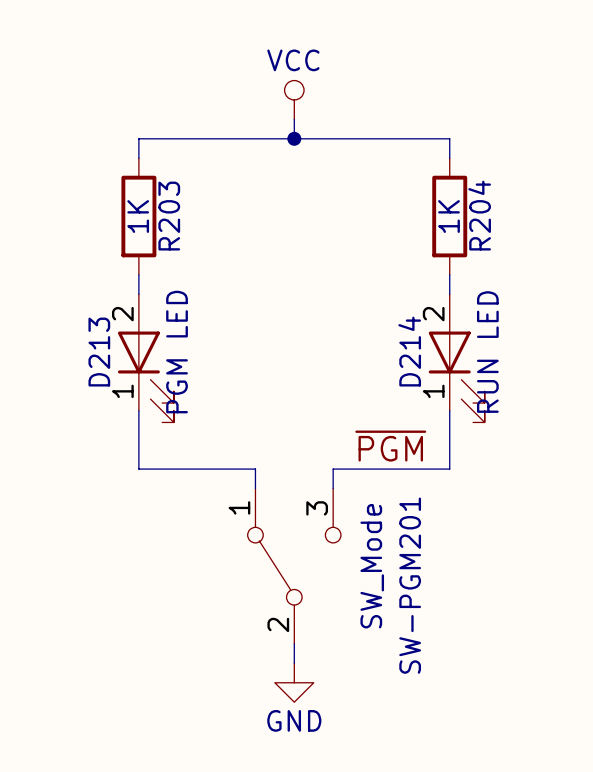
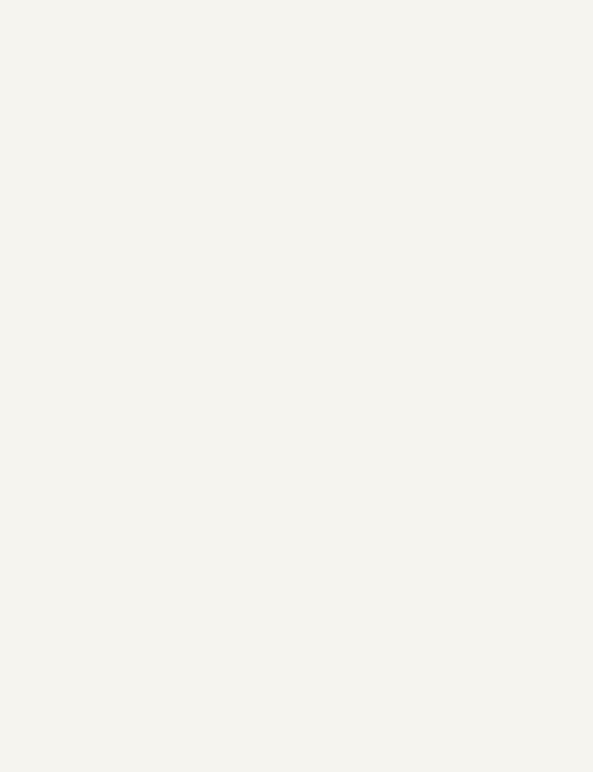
power symbol: VCC (294, 99) -> none
wire: (294, 119) (294, 138) -> none
junction: (294, 138) -> none
wire: (138, 158) (138, 138) (449, 138) (449, 158) -> none
R203: 1K (138, 216) -> none
R204: 1K (449, 216) -> none
wire: (138, 274) (138, 294) -> none
wire: (449, 274) (449, 294) -> none
D213: PGM LED (145, 358) -> none
D214: RUN LED (456, 358) -> none
wire: (138, 410) (138, 469) (255, 469) (255, 488) -> none
wire: (449, 410) (449, 469) (333, 469) (333, 488) -> none
label: ~{PGM} (390, 446) -> none
SW-PGM201: SW_Mode (294, 566) -> none
wire: (294, 643) (294, 663) -> none
power symbol: GND (294, 682) -> none

